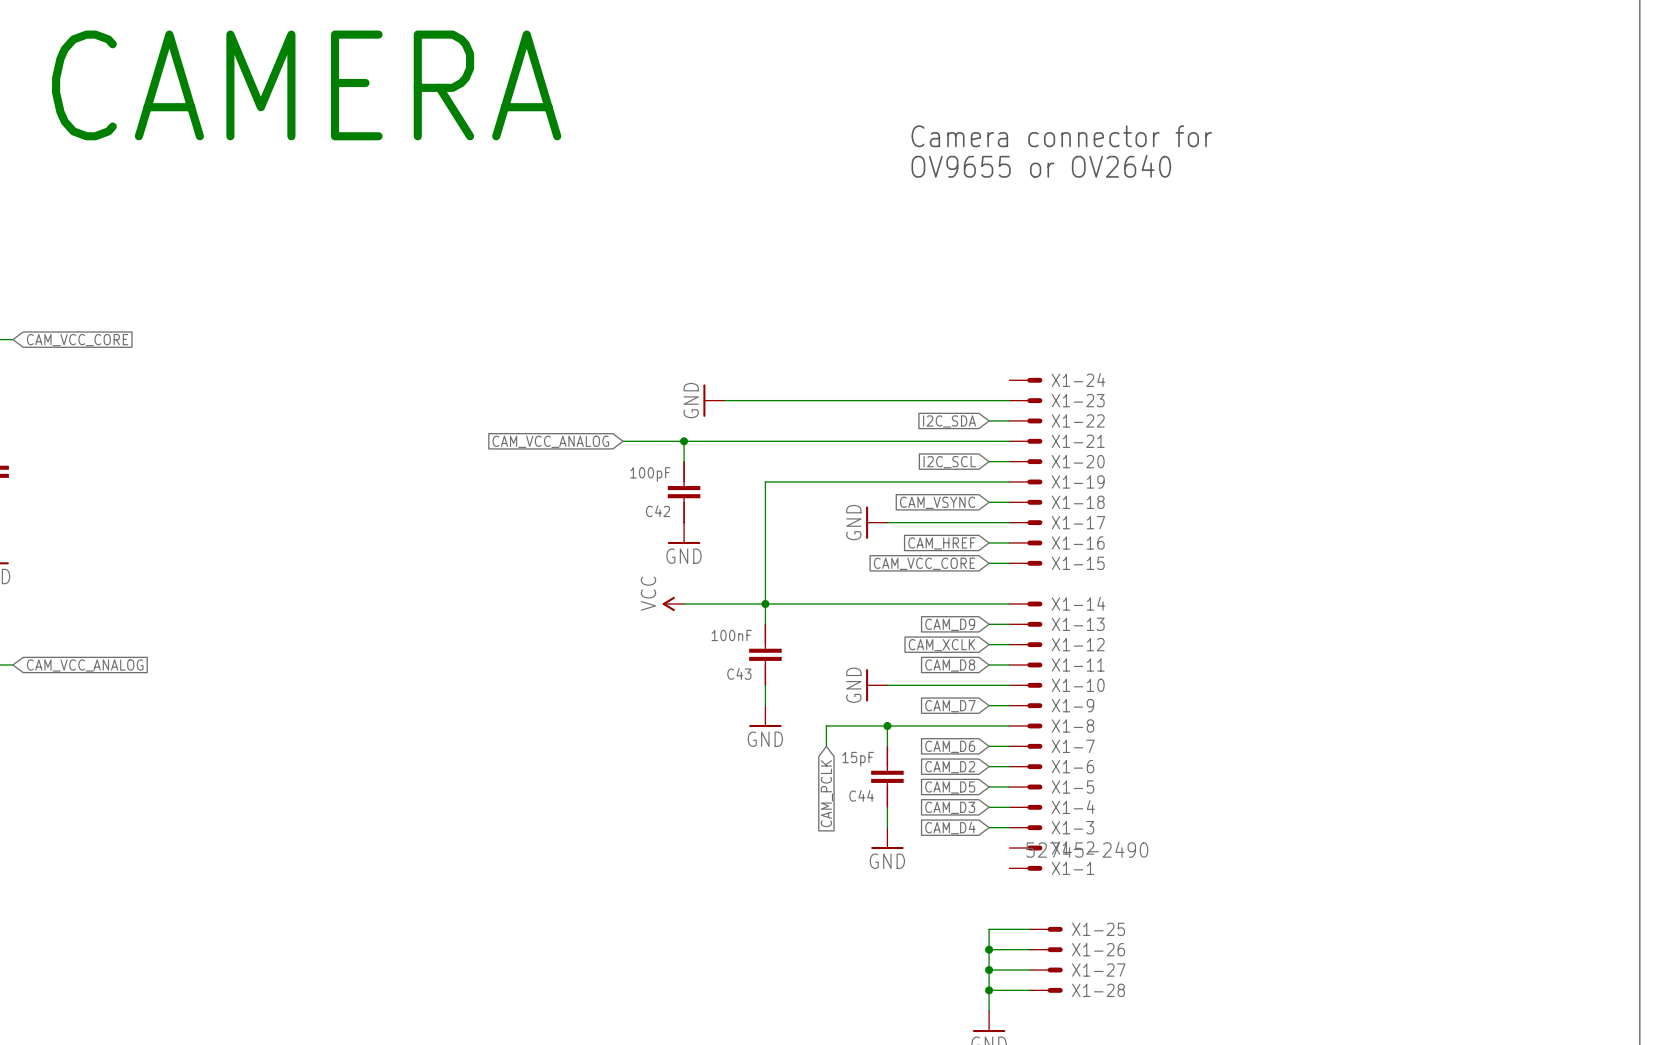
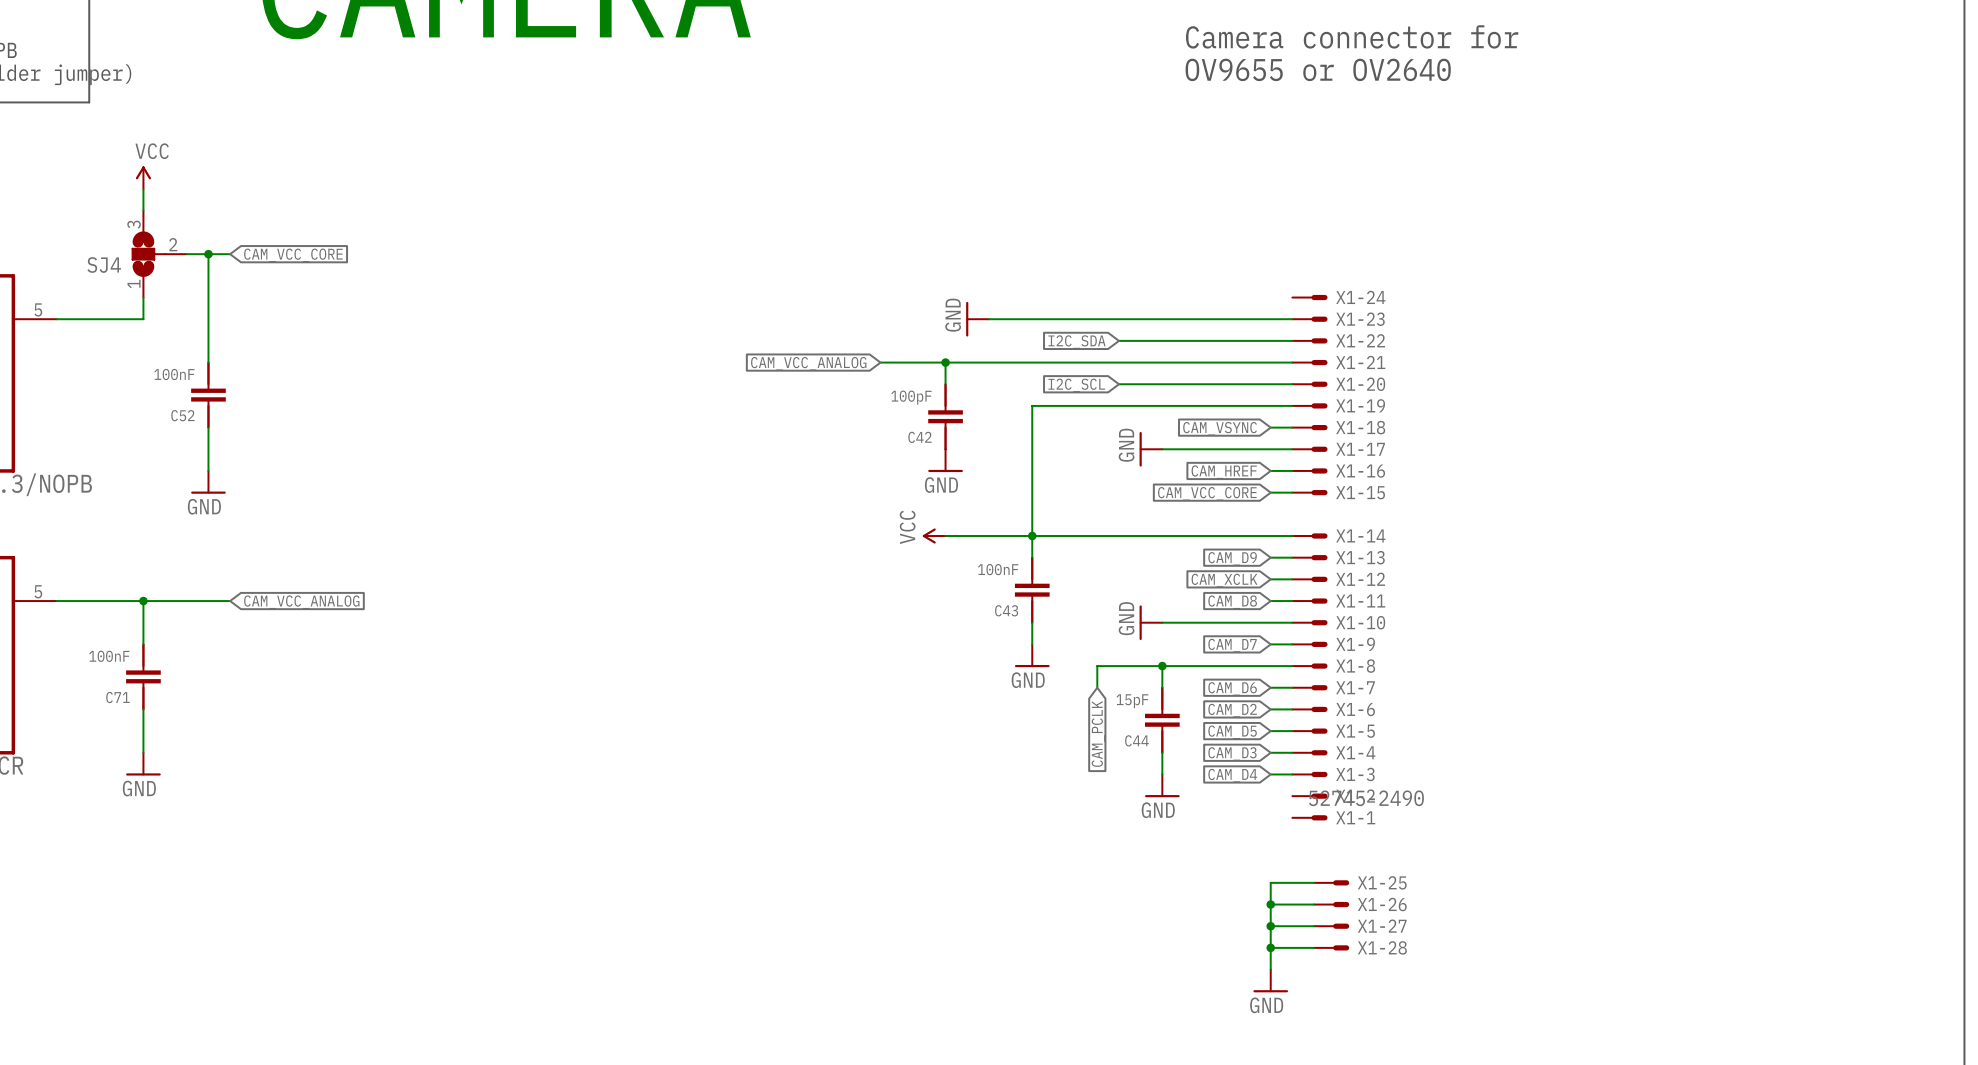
wire: none -> (1118, 340) (1270, 340)
global label position: I2C_SDA (949, 421) -> I2C_SDA (1077, 342)
wire: none -> (1118, 384) (1270, 384)
global label position: I2C_SCL (949, 462) -> I2C_SCL (1076, 385)

